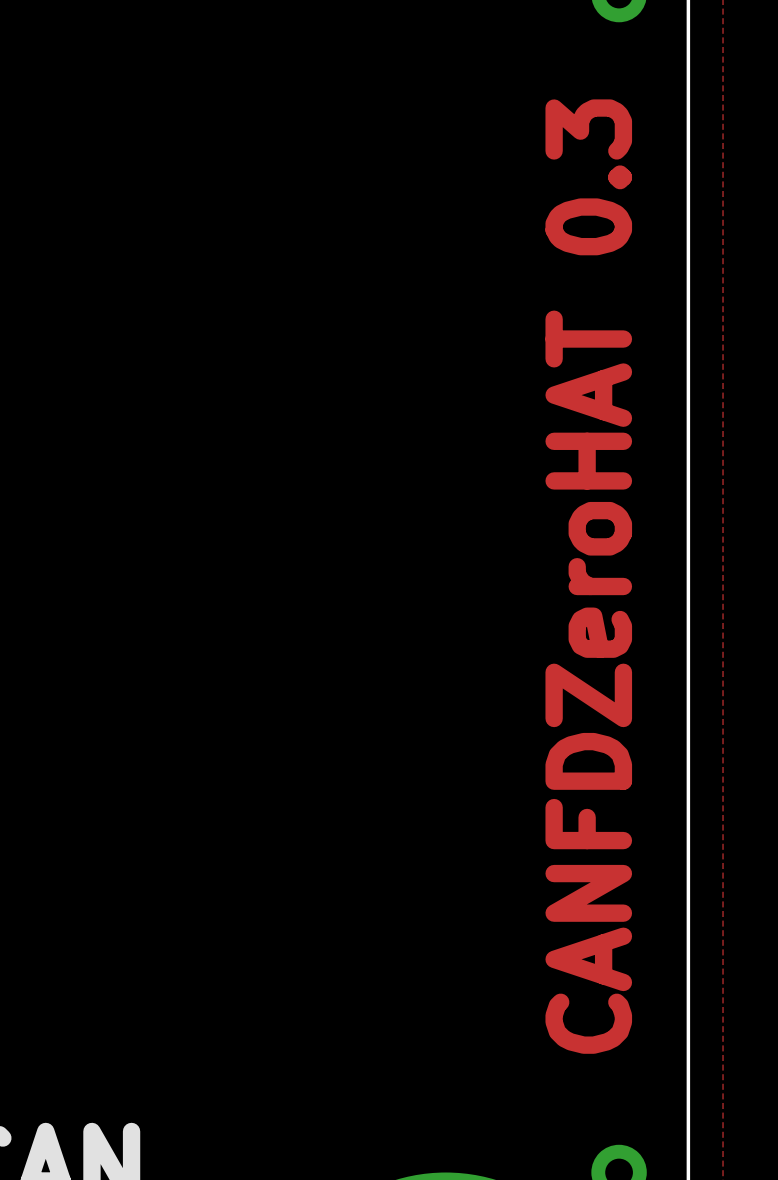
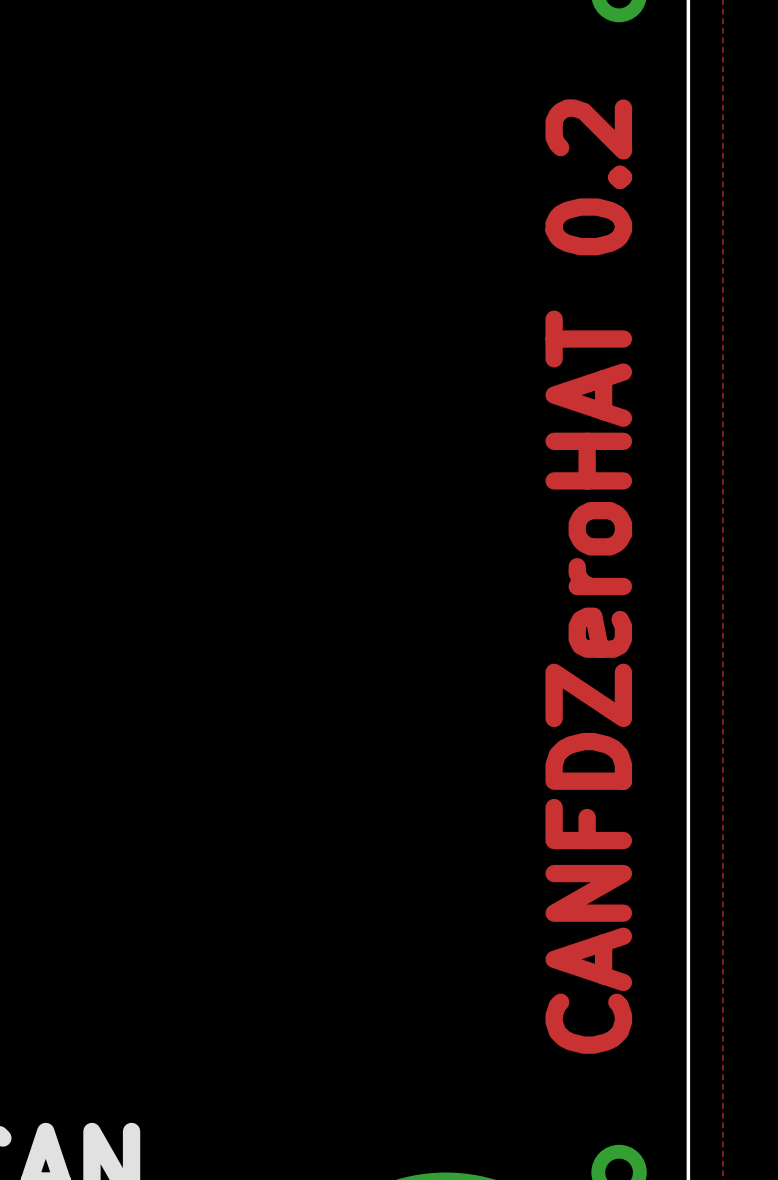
text: CANFDZeroHAT 0.3 (588, 576) -> CANFDZeroHAT 0.2 (588, 576)

